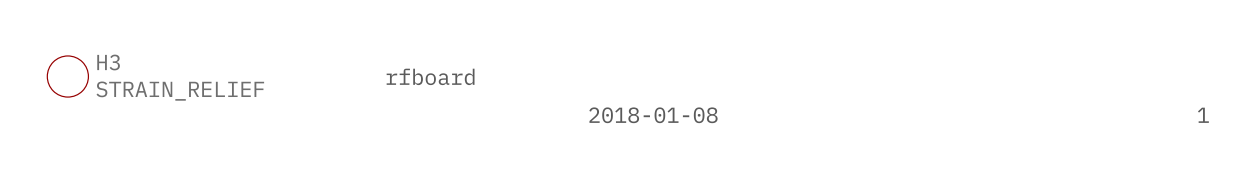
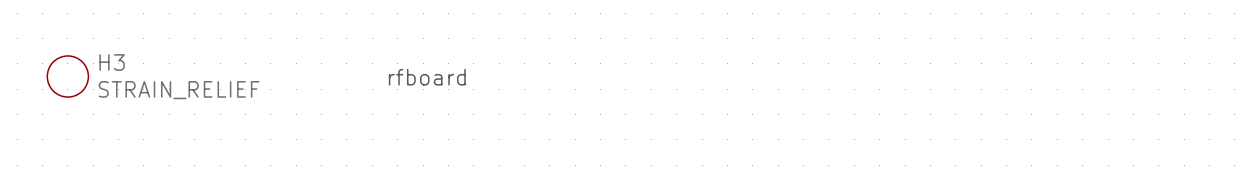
text: 2018-01-08 (653, 115) -> none
text: 1 (1203, 115) -> none

